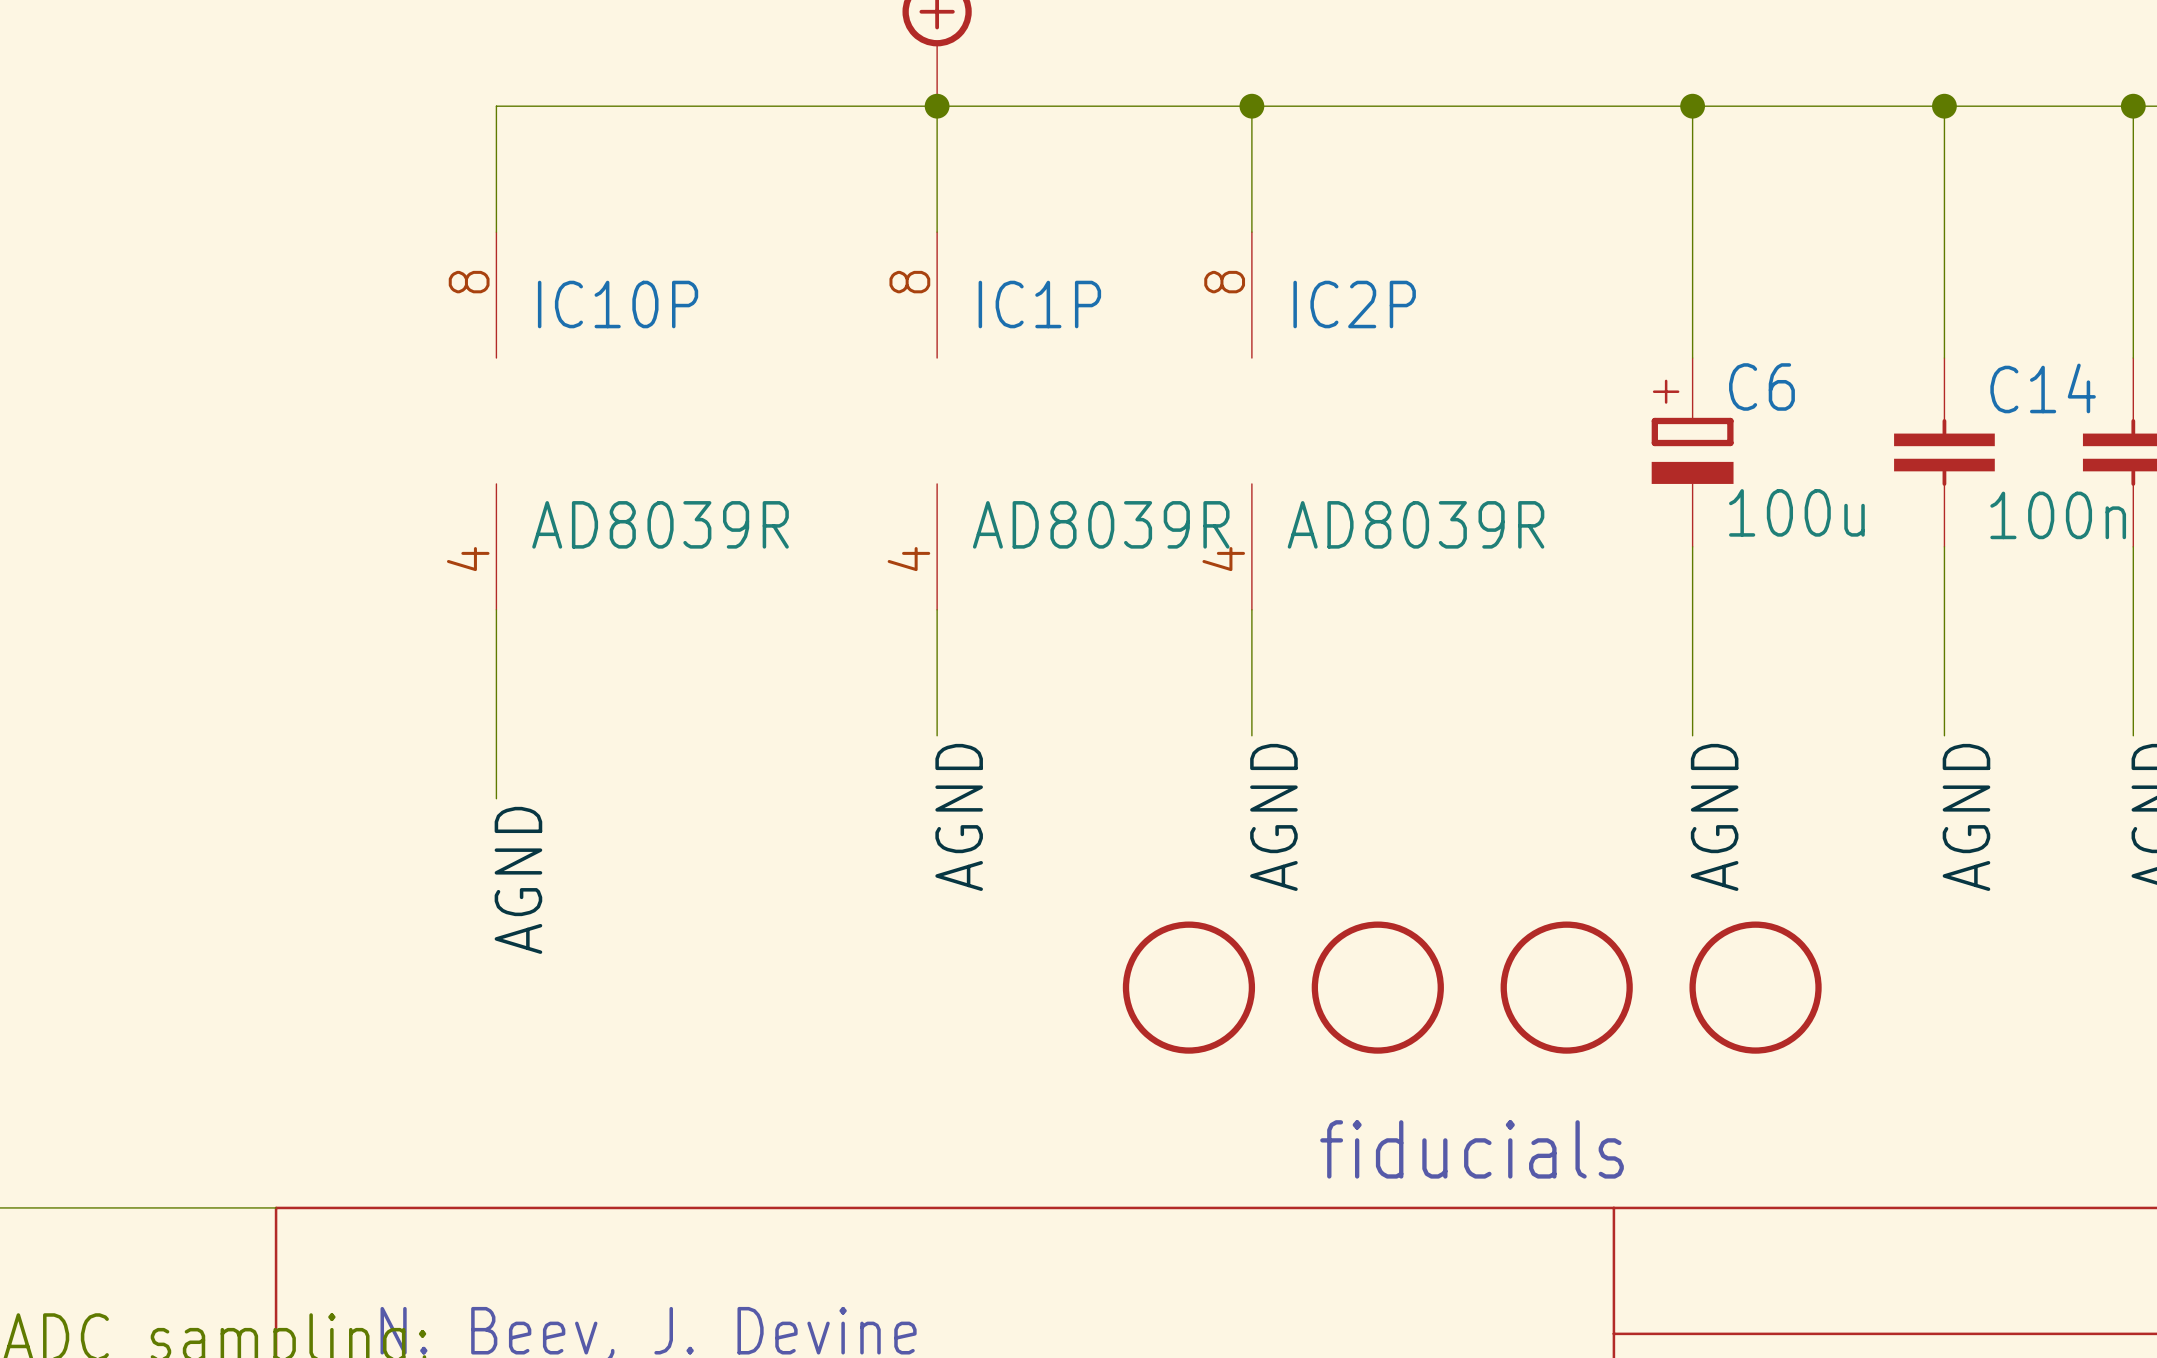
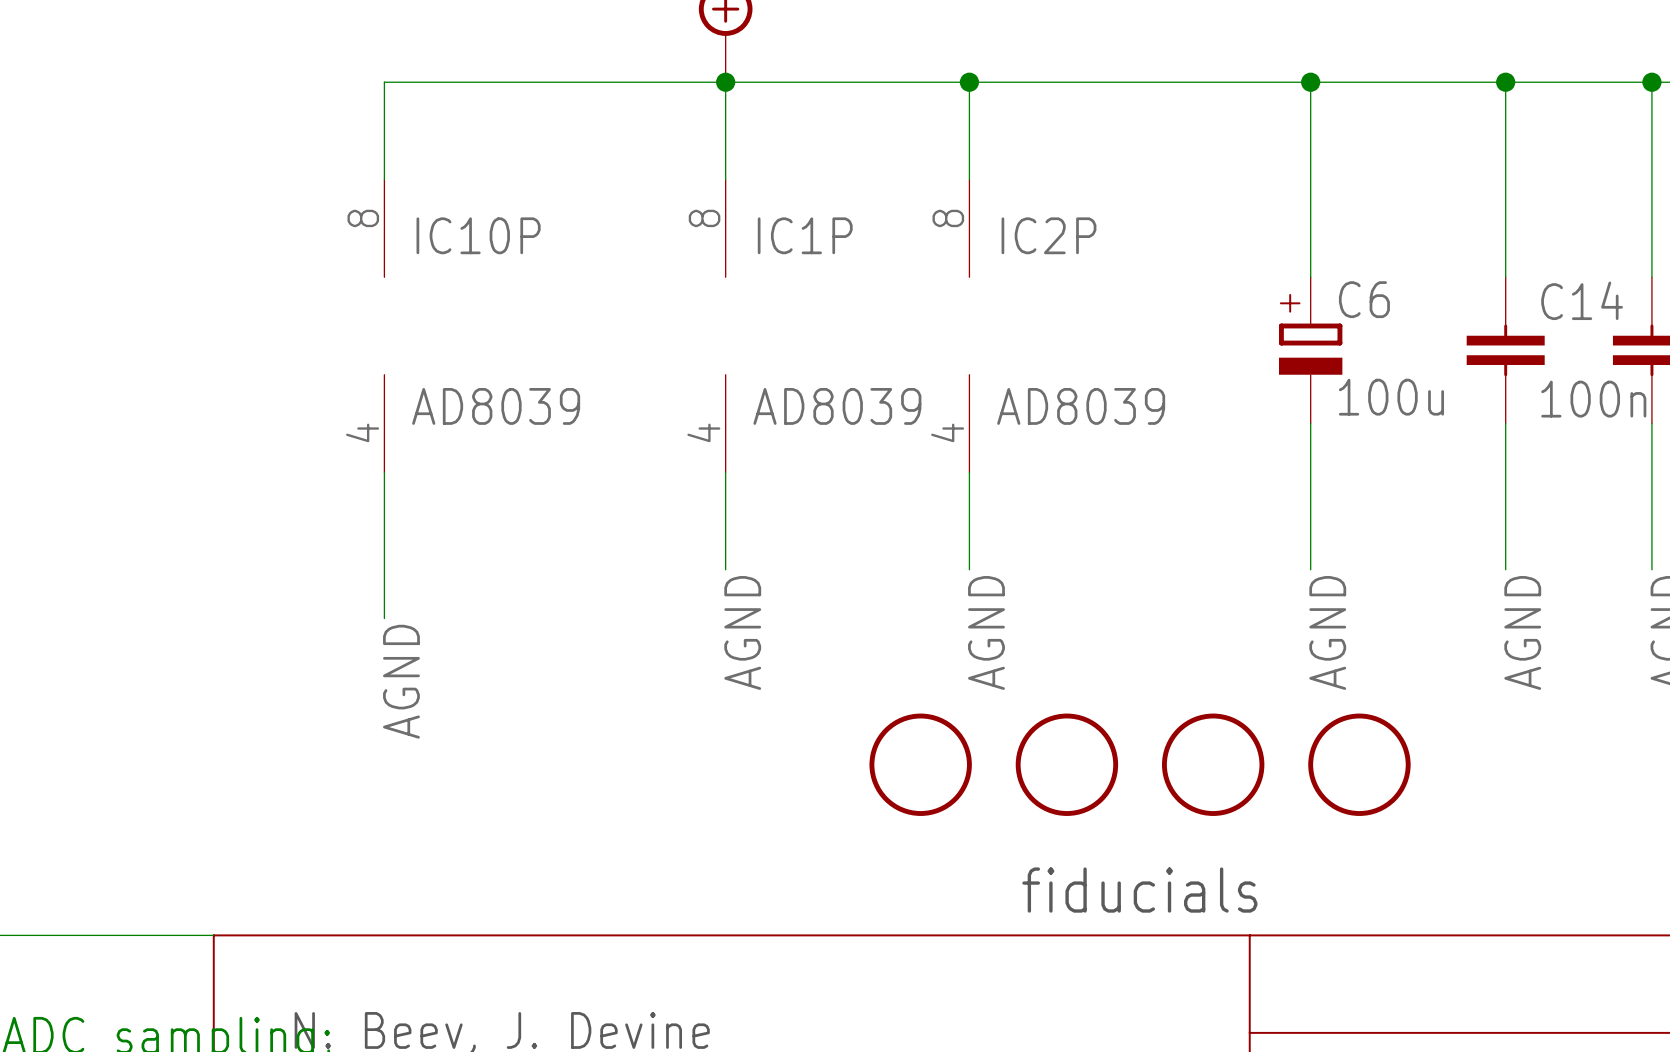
IC10P value: AD8039R (660, 524) -> AD8039 (496, 406)
IC1P value: AD8039R (1101, 524) -> AD8039 (837, 406)
IC2P value: AD8039R (1416, 524) -> AD8039 (1081, 406)

